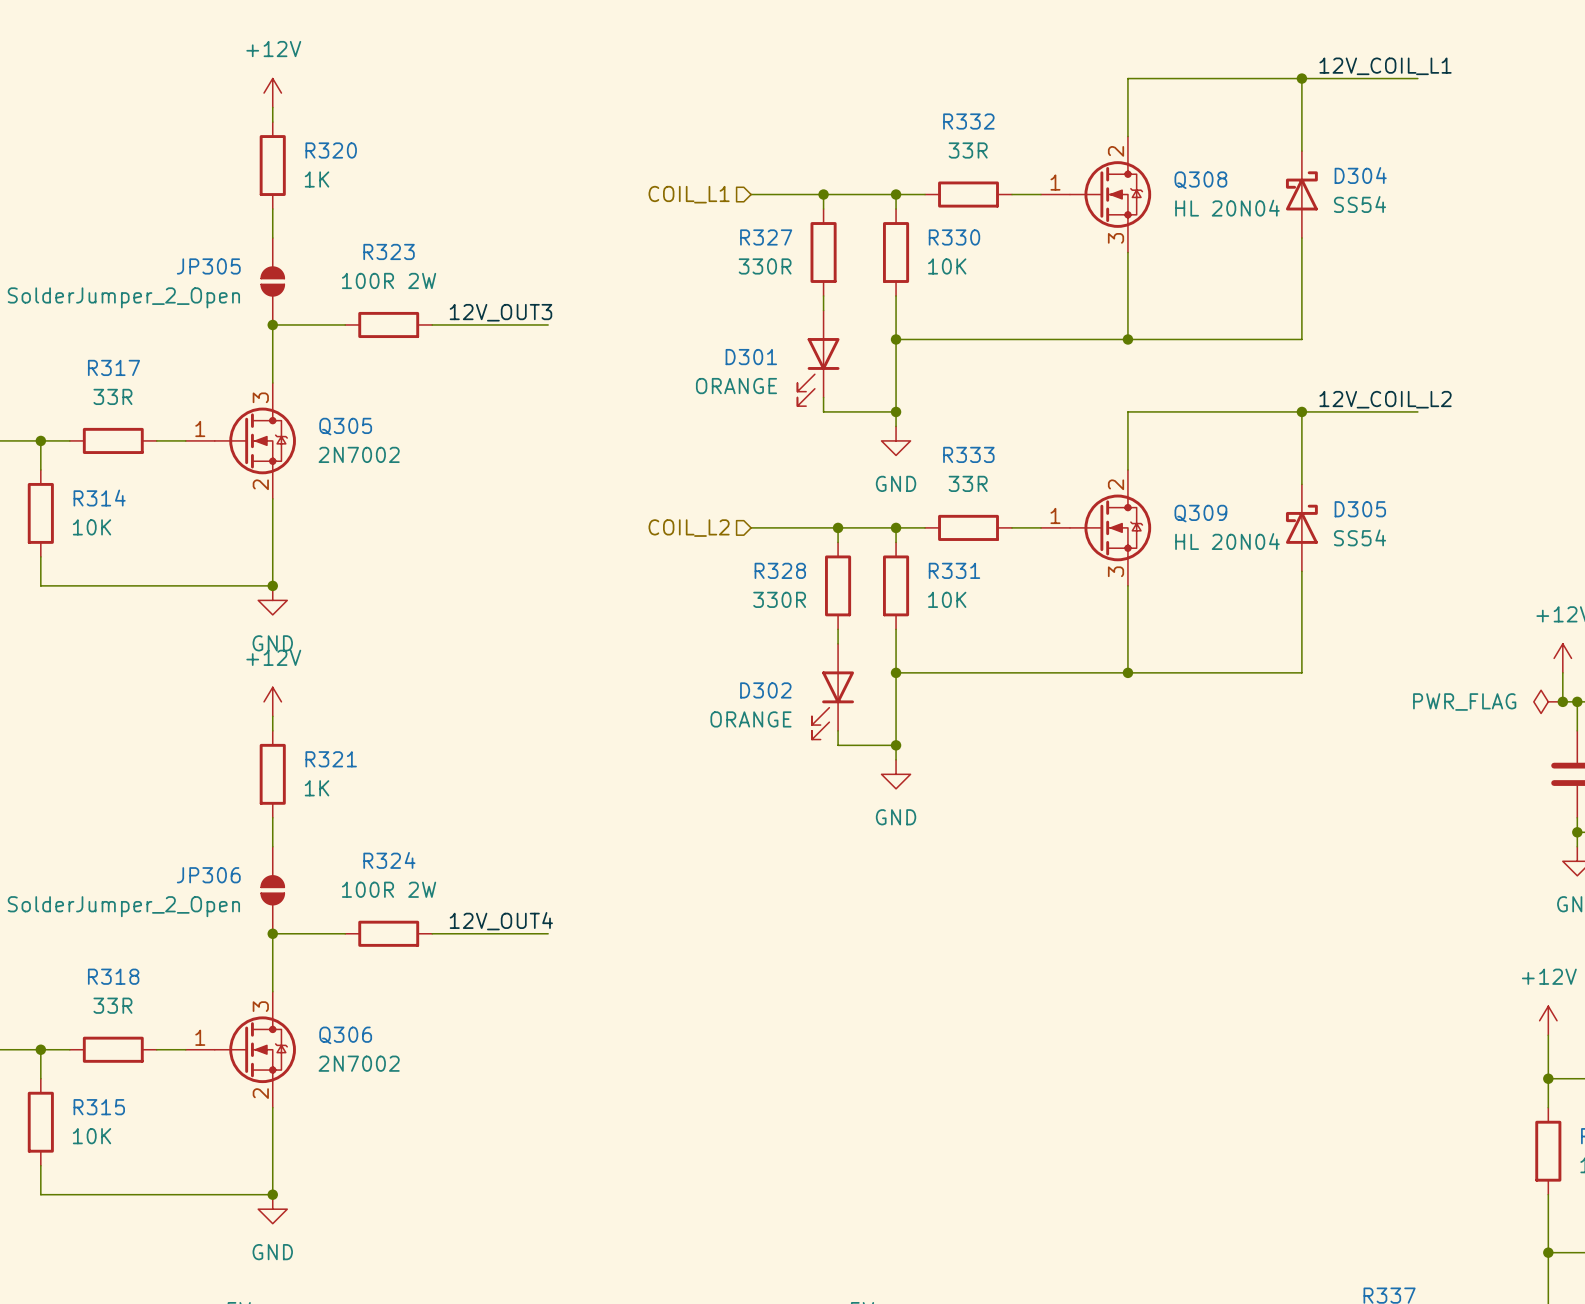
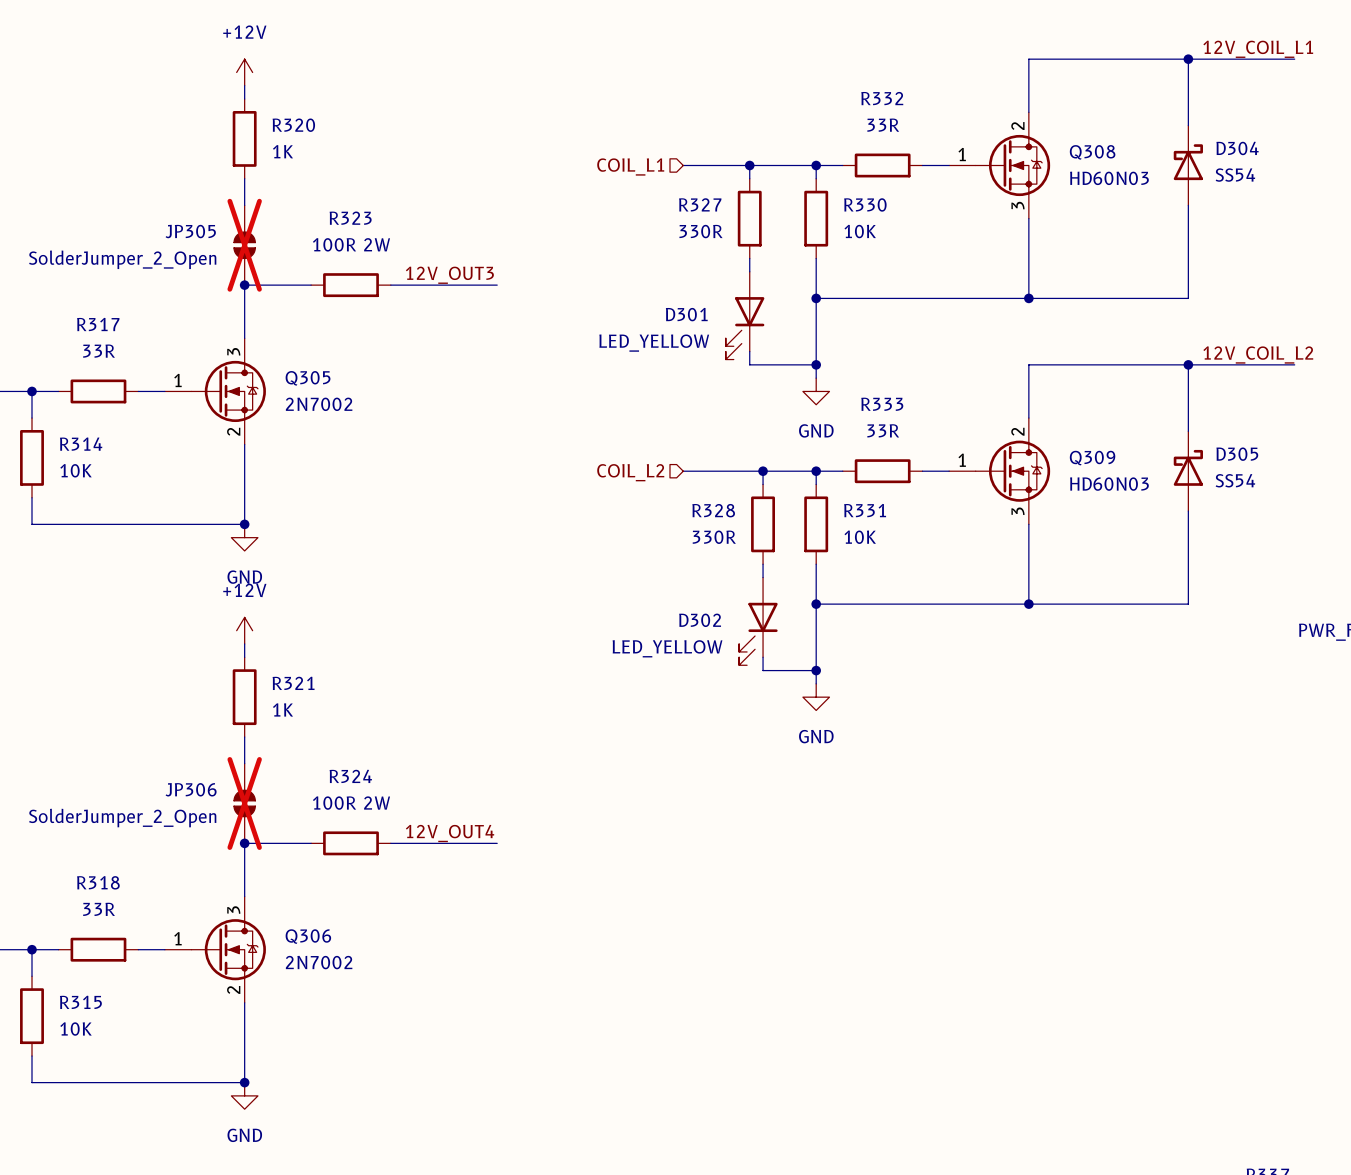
Q308 value: HL 20N04 (1227, 208) -> HD60N03 (1109, 178)
JP305 do-not-place cross: none -> (244, 245)
D301 value: ORANGE (736, 386) -> LED_YELLOW (654, 343)
Q309 value: HL 20N04 (1227, 541) -> HD60N03 (1109, 484)
D302 value: ORANGE (750, 719) -> LED_YELLOW (667, 648)
JP306 do-not-place cross: none -> (244, 803)

